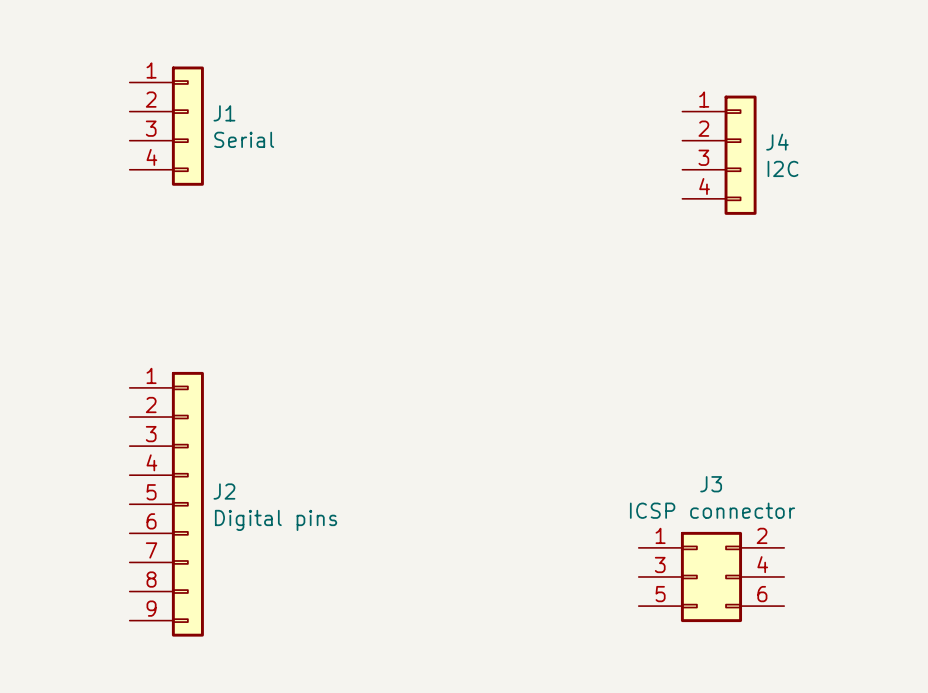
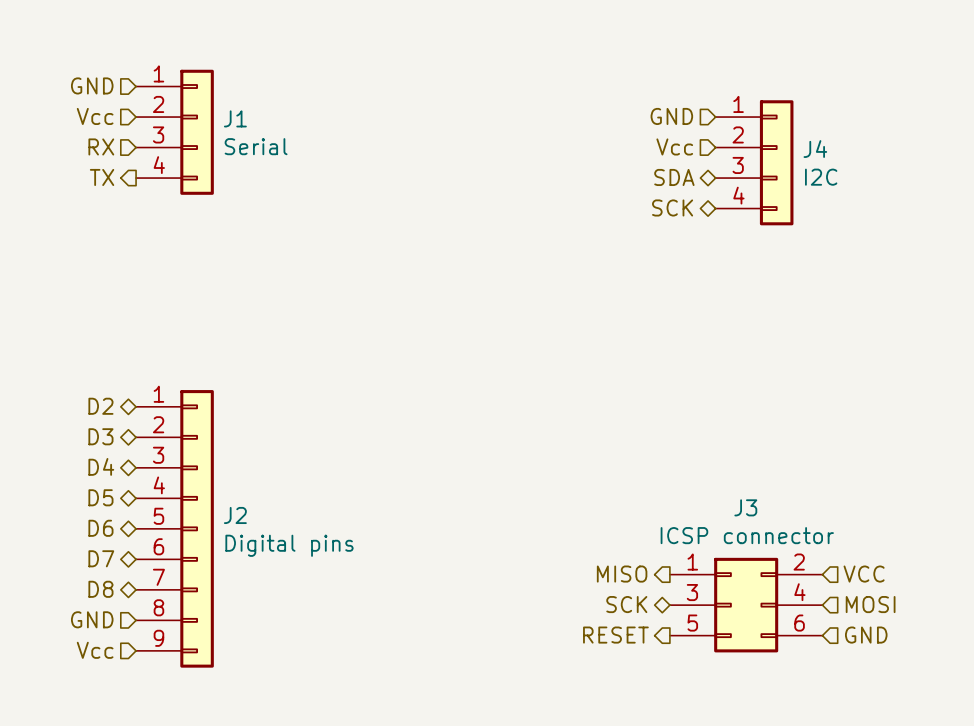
hierarchical label: none -> GND (92, 85)
hierarchical label: none -> Vcc (95, 116)
hierarchical label: none -> GND (671, 116)
hierarchical label: none -> RX (101, 146)
hierarchical label: none -> Vcc (674, 146)
hierarchical label: none -> TX (102, 177)
hierarchical label: none -> SDA (674, 177)
hierarchical label: none -> SCK (672, 207)
hierarchical label: none -> D2 (100, 406)
hierarchical label: none -> D3 (100, 436)
hierarchical label: none -> D4 (101, 466)
hierarchical label: none -> D5 (100, 497)
hierarchical label: none -> D6 (100, 528)
hierarchical label: none -> D7 (101, 558)
hierarchical label: none -> MISO (622, 574)
hierarchical label: none -> VCC (864, 574)
hierarchical label: none -> D8 (100, 589)
hierarchical label: none -> SCK (626, 604)
hierarchical label: none -> MOSI (870, 604)
hierarchical label: none -> GND (92, 619)
hierarchical label: none -> RESET (615, 635)
hierarchical label: none -> GND (866, 635)
hierarchical label: none -> Vcc (95, 650)

